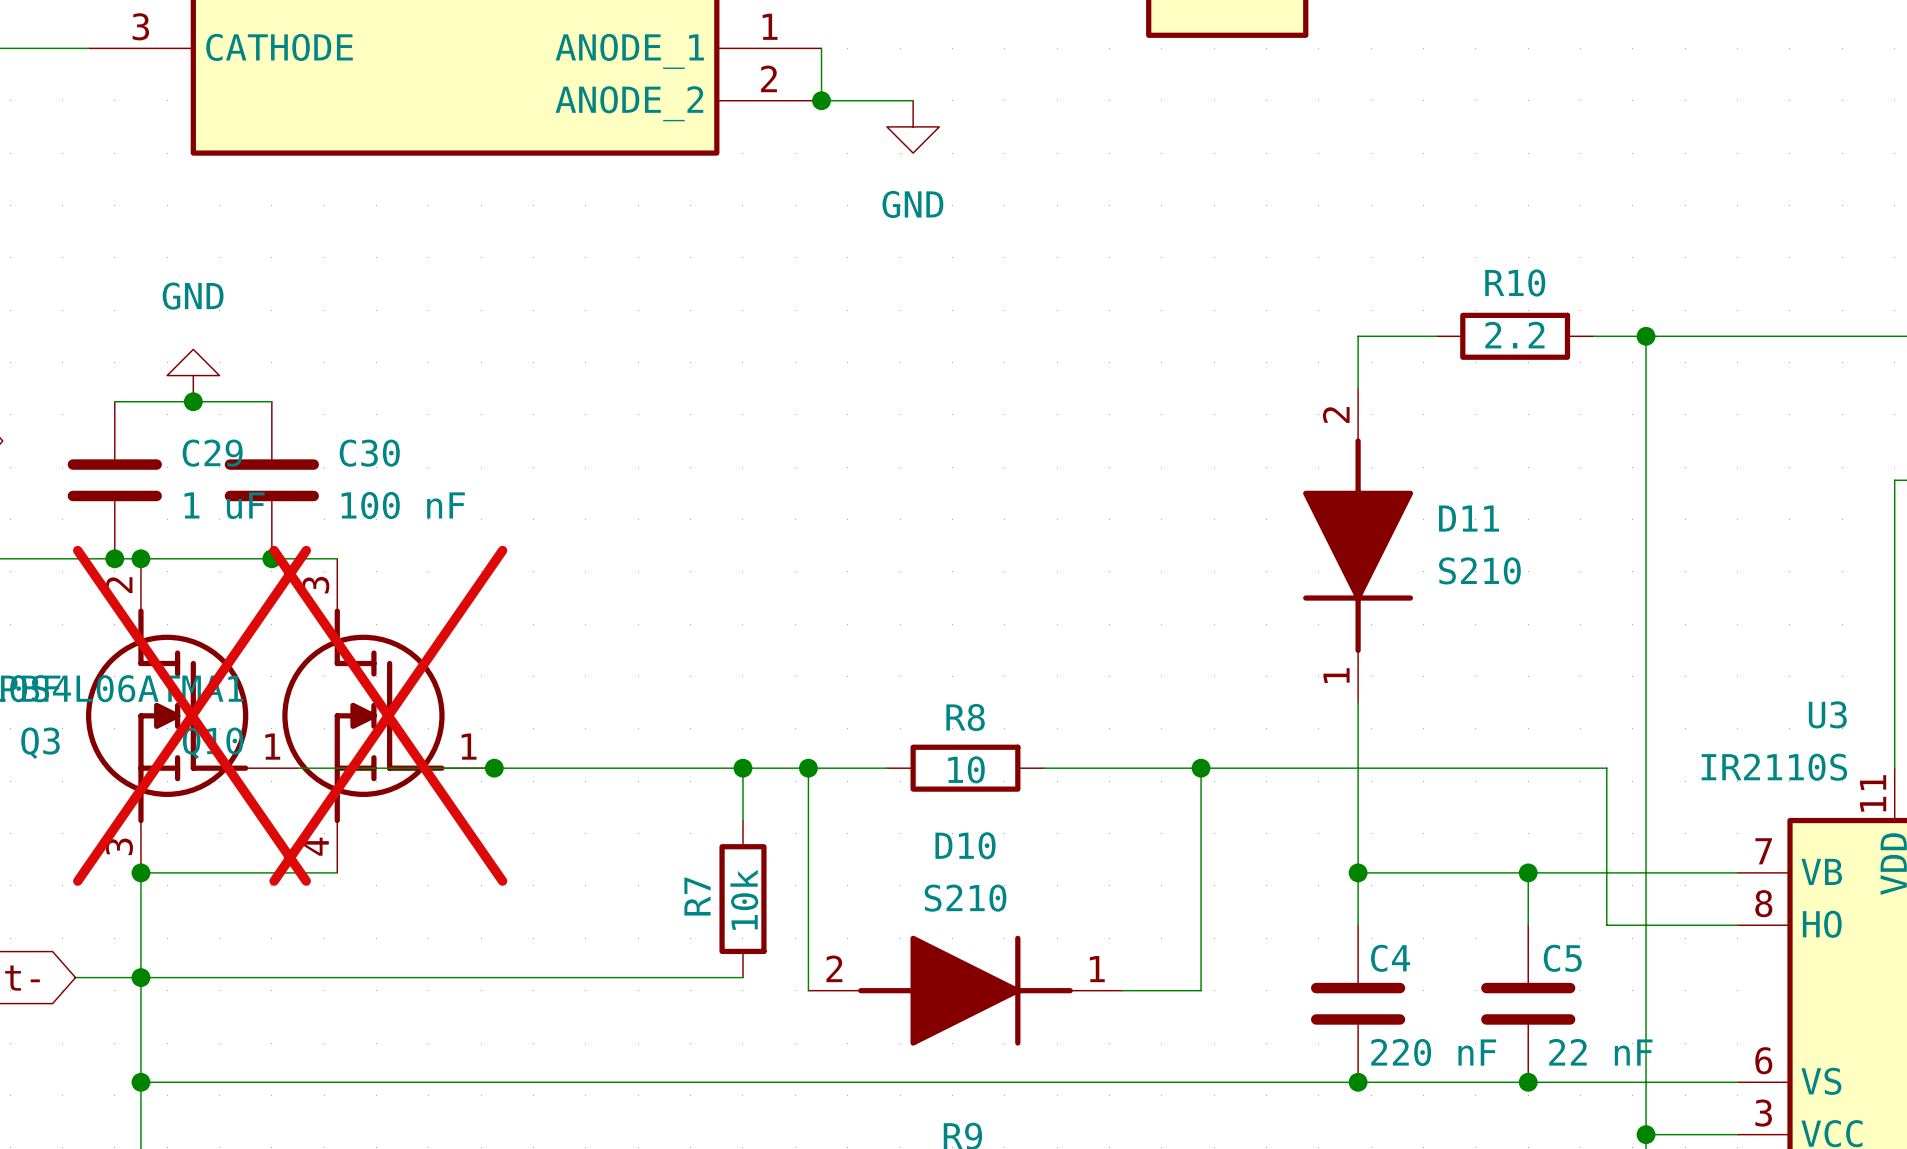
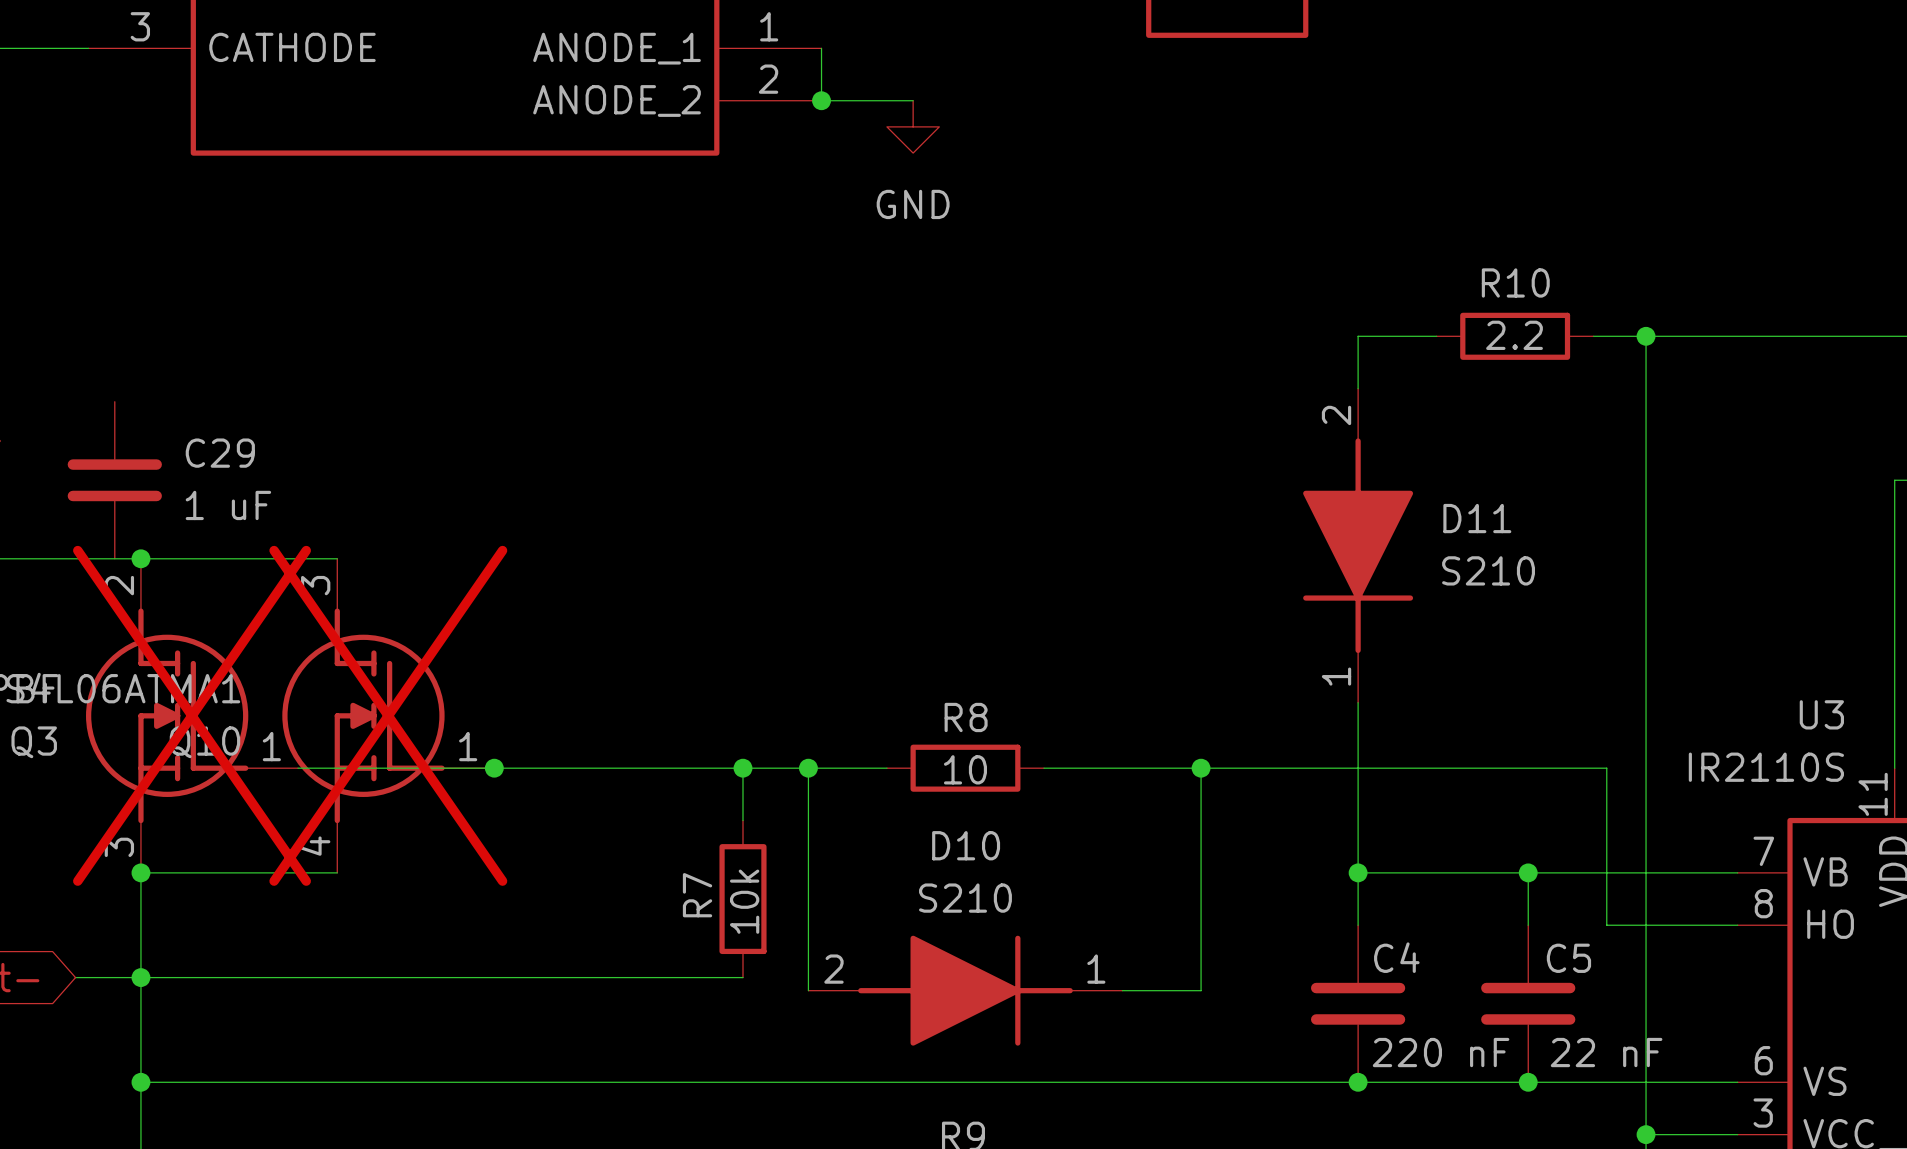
power symbol: GND (193, 375) -> none
wire: (114, 401) (271, 401) -> none
junction: (193, 401) -> none
C30: 100 nF (271, 480) -> none
junction: (114, 558) -> none
junction: (271, 558) -> none

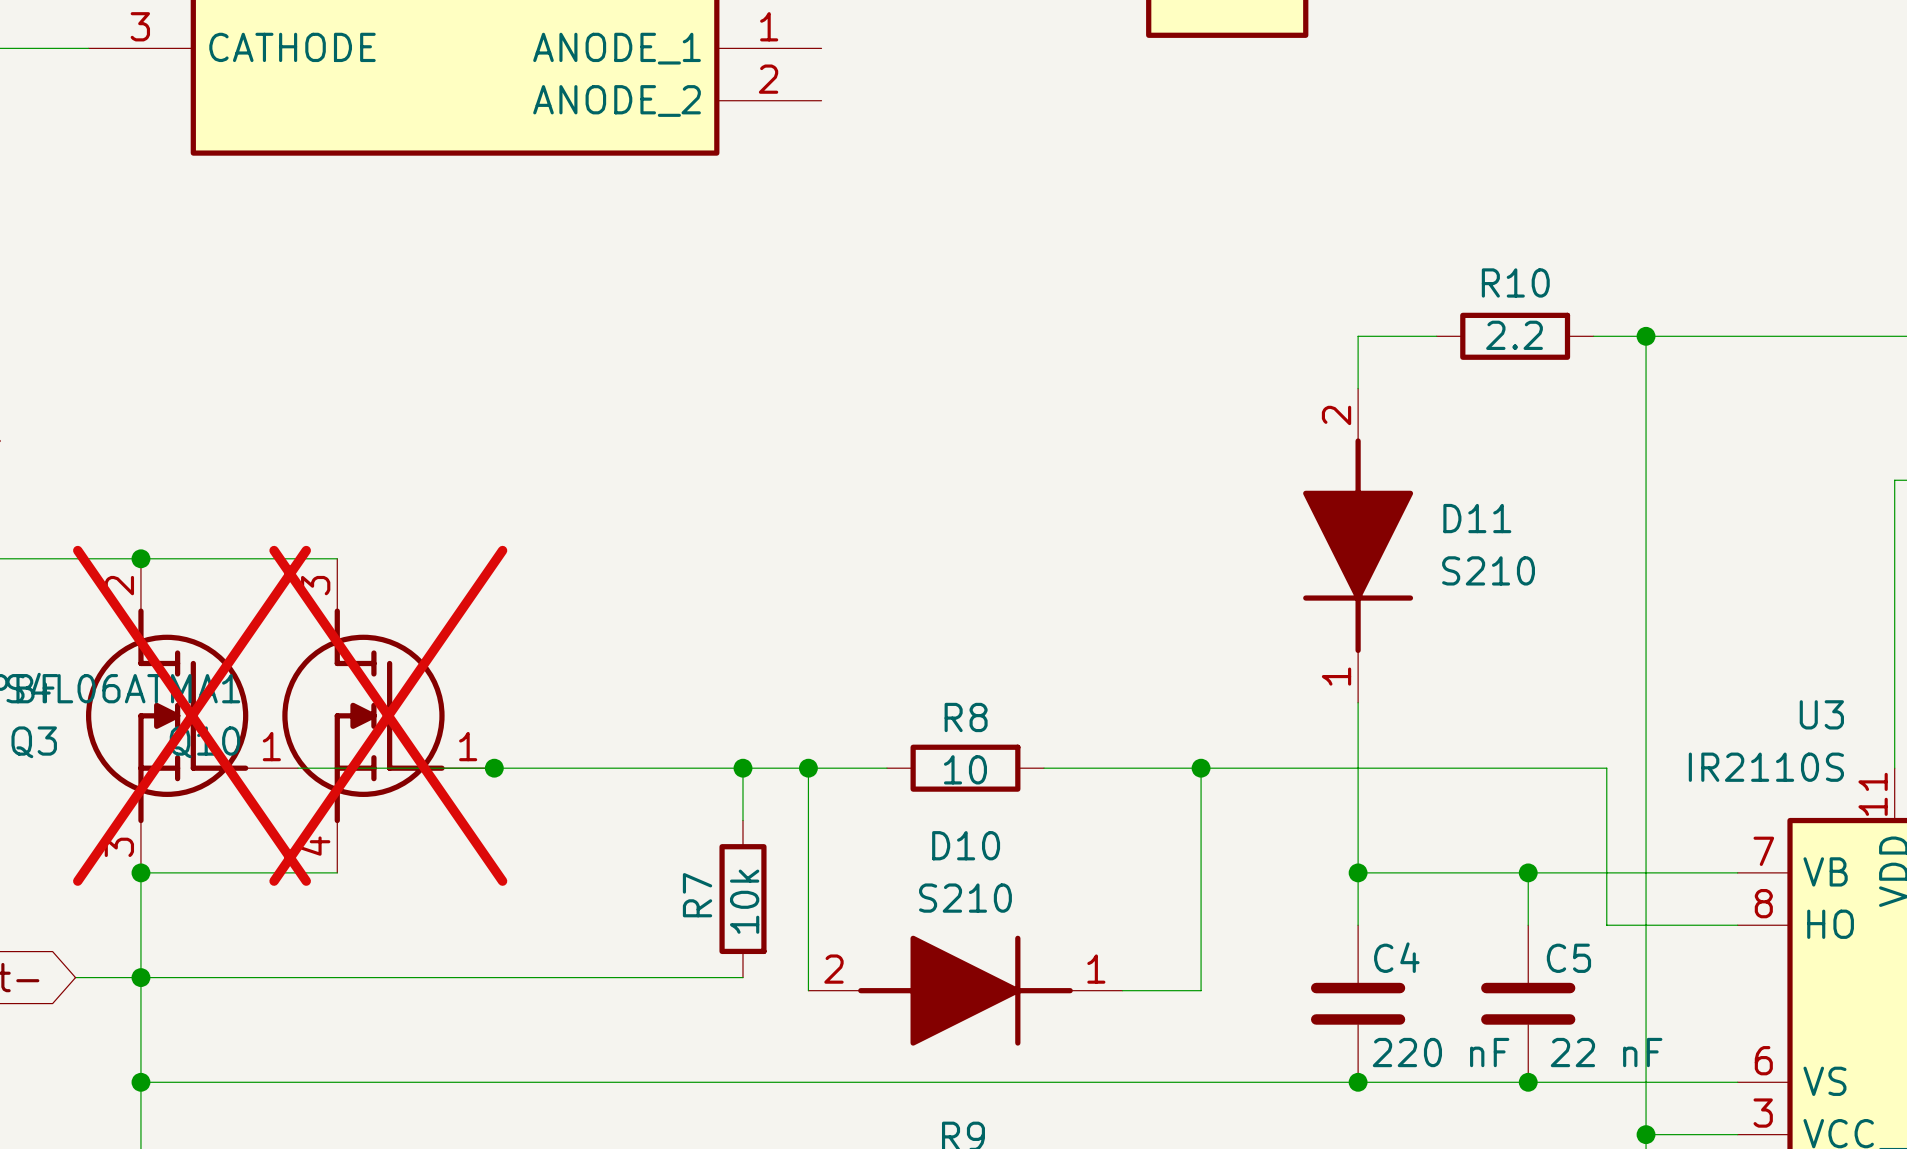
wire: (821, 48) (821, 100) (913, 100) -> none
junction: (821, 100) -> none
power symbol: GND (913, 126) -> none
C29: 1 uF (114, 480) -> none

